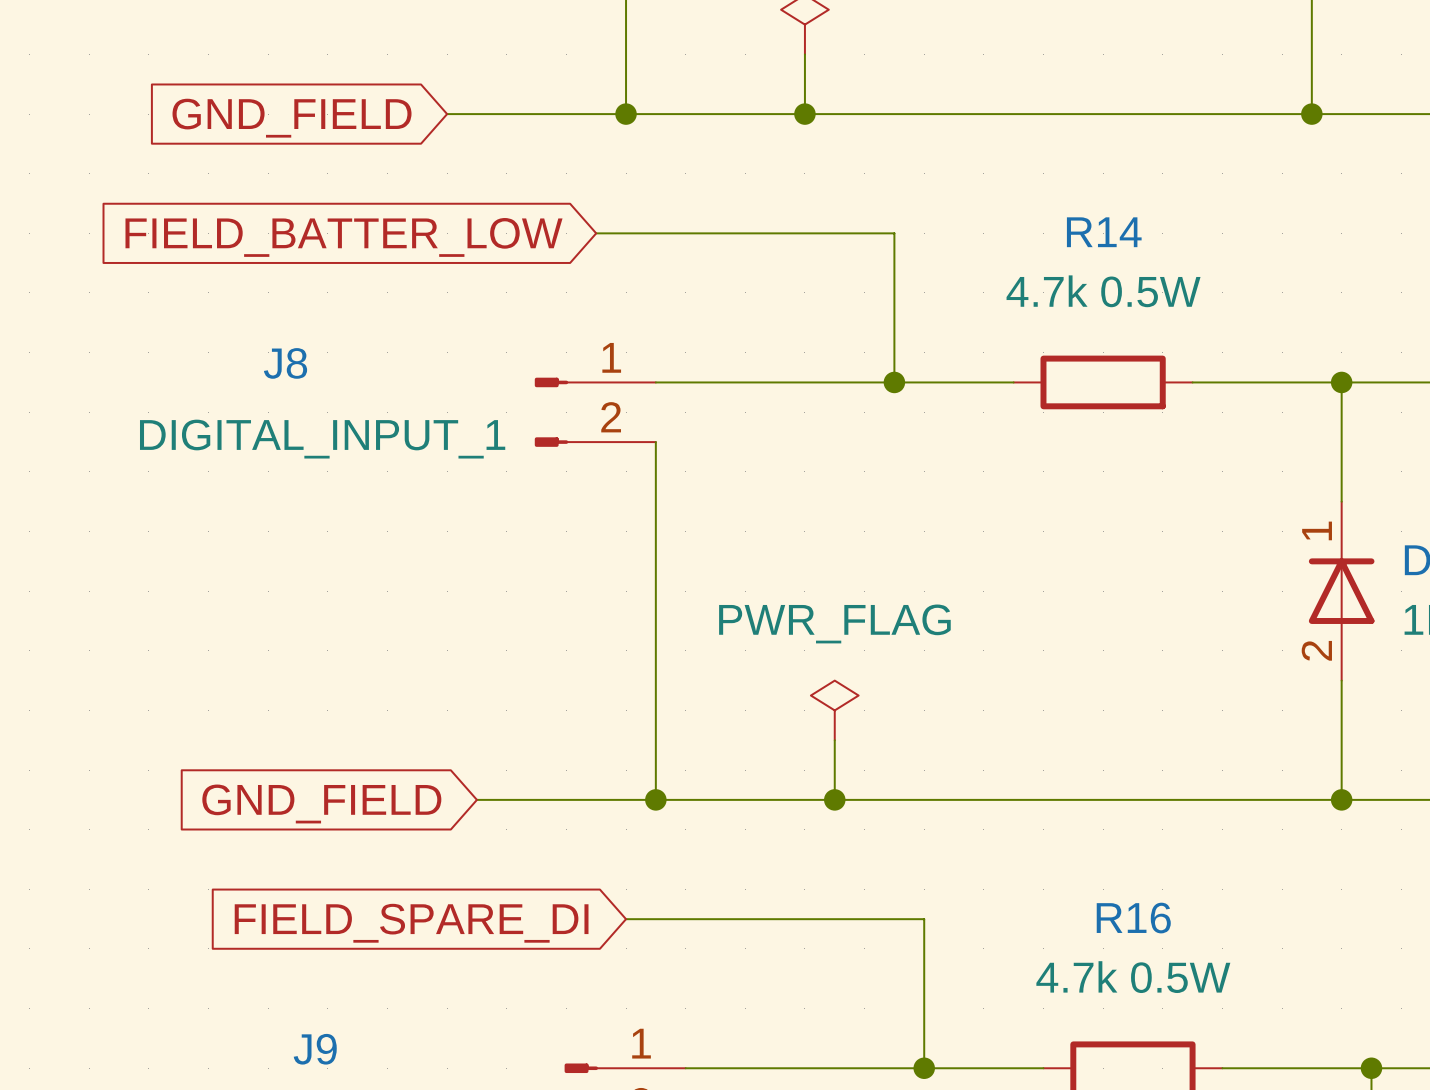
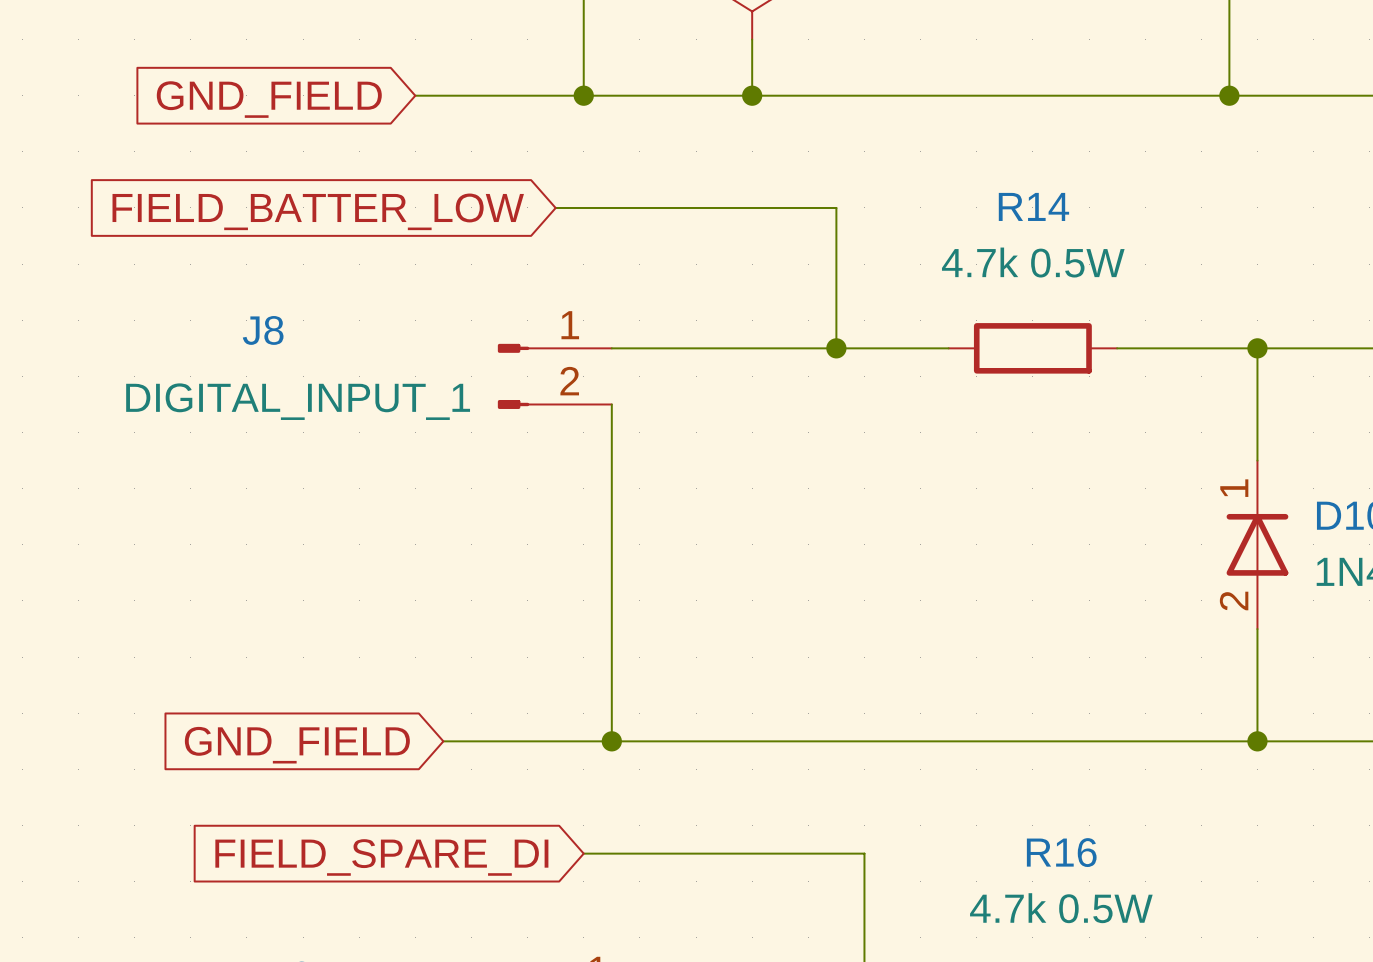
power symbol: PWR_FLAG (834, 710) -> none
wire: (834, 740) (834, 799) -> none
junction: (834, 799) -> none

